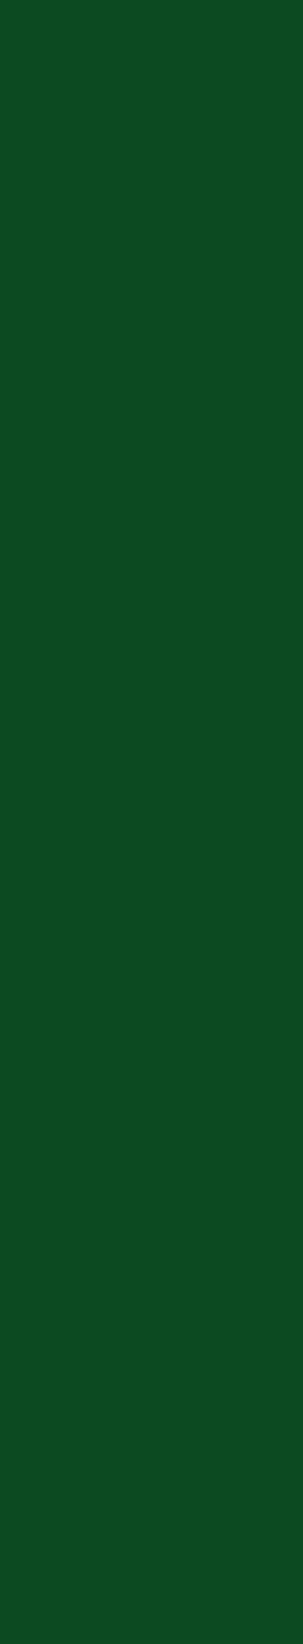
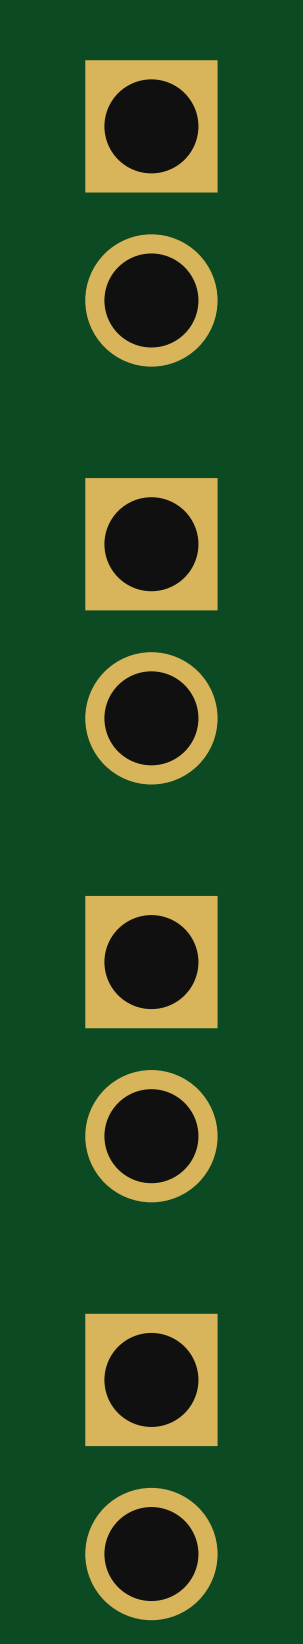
part: none -> (151, 213)
part: none -> (151, 631)
part: none -> (151, 1049)
part: none -> (151, 1466)

